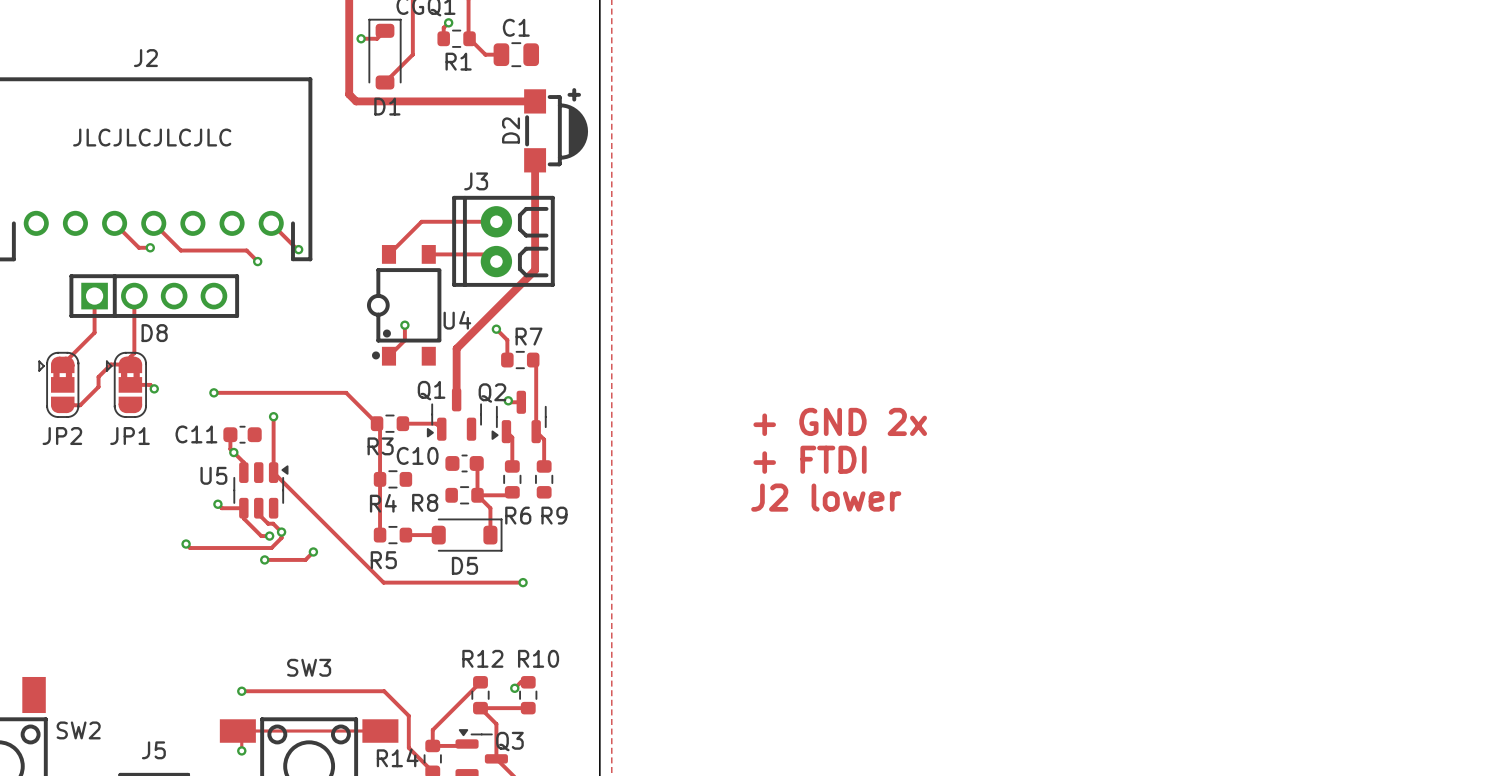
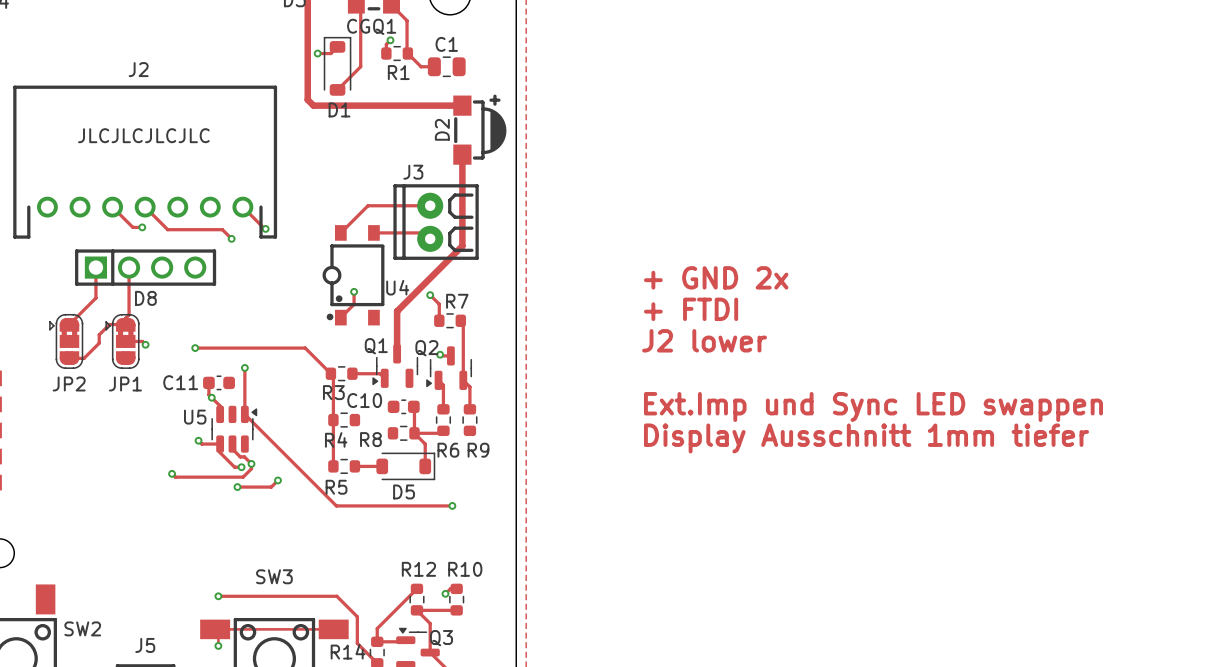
text: none -> + FTDI (691, 309)
text: none -> J2 lower (704, 340)
text position: + GND 2x (840, 421) -> + GND 2x (716, 277)
text: + FTDI (810, 459) -> Ext.Imp und Sync LED swappen (873, 406)
text: J2 lower (826, 497) -> Display Ausschnitt 1mm tiefer (866, 438)

